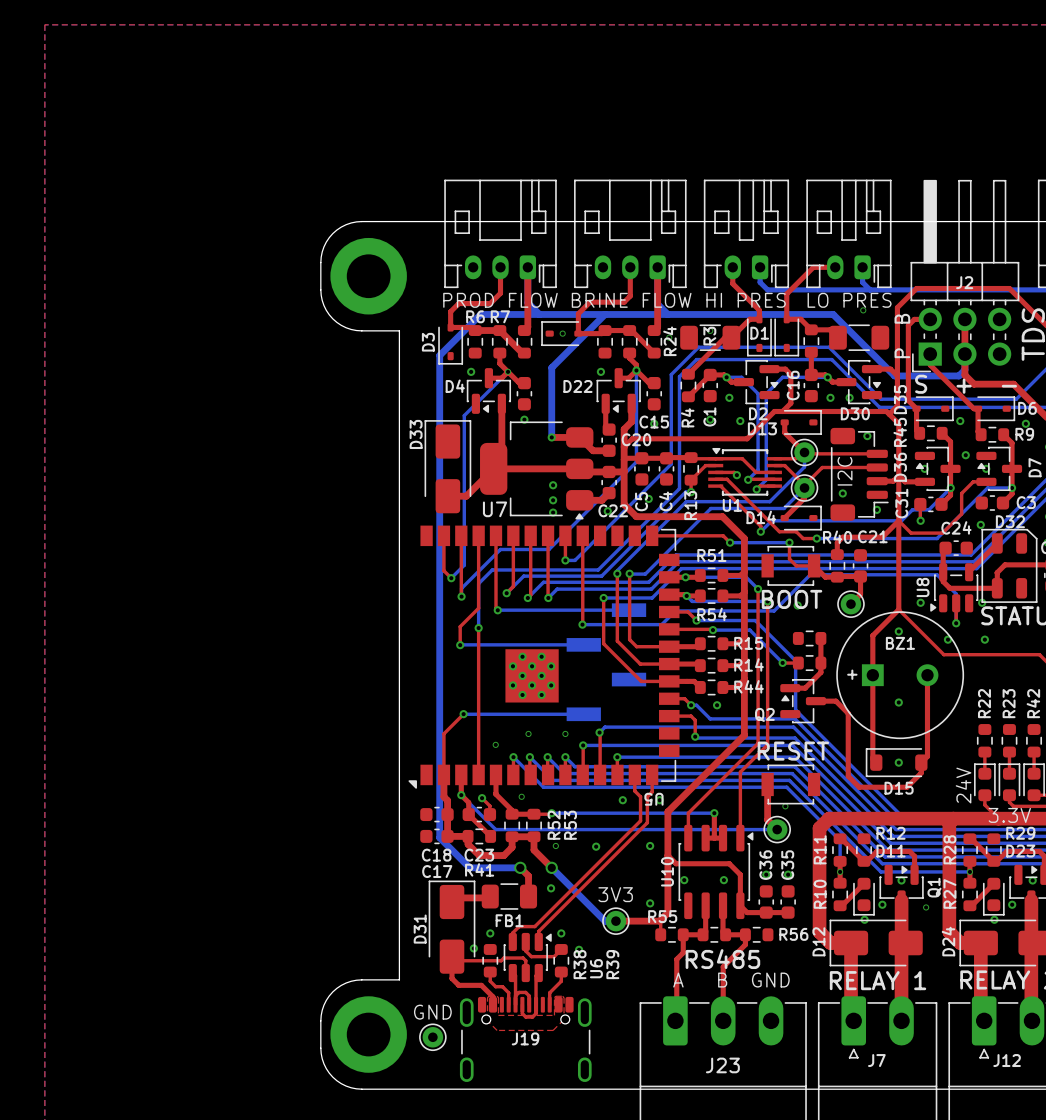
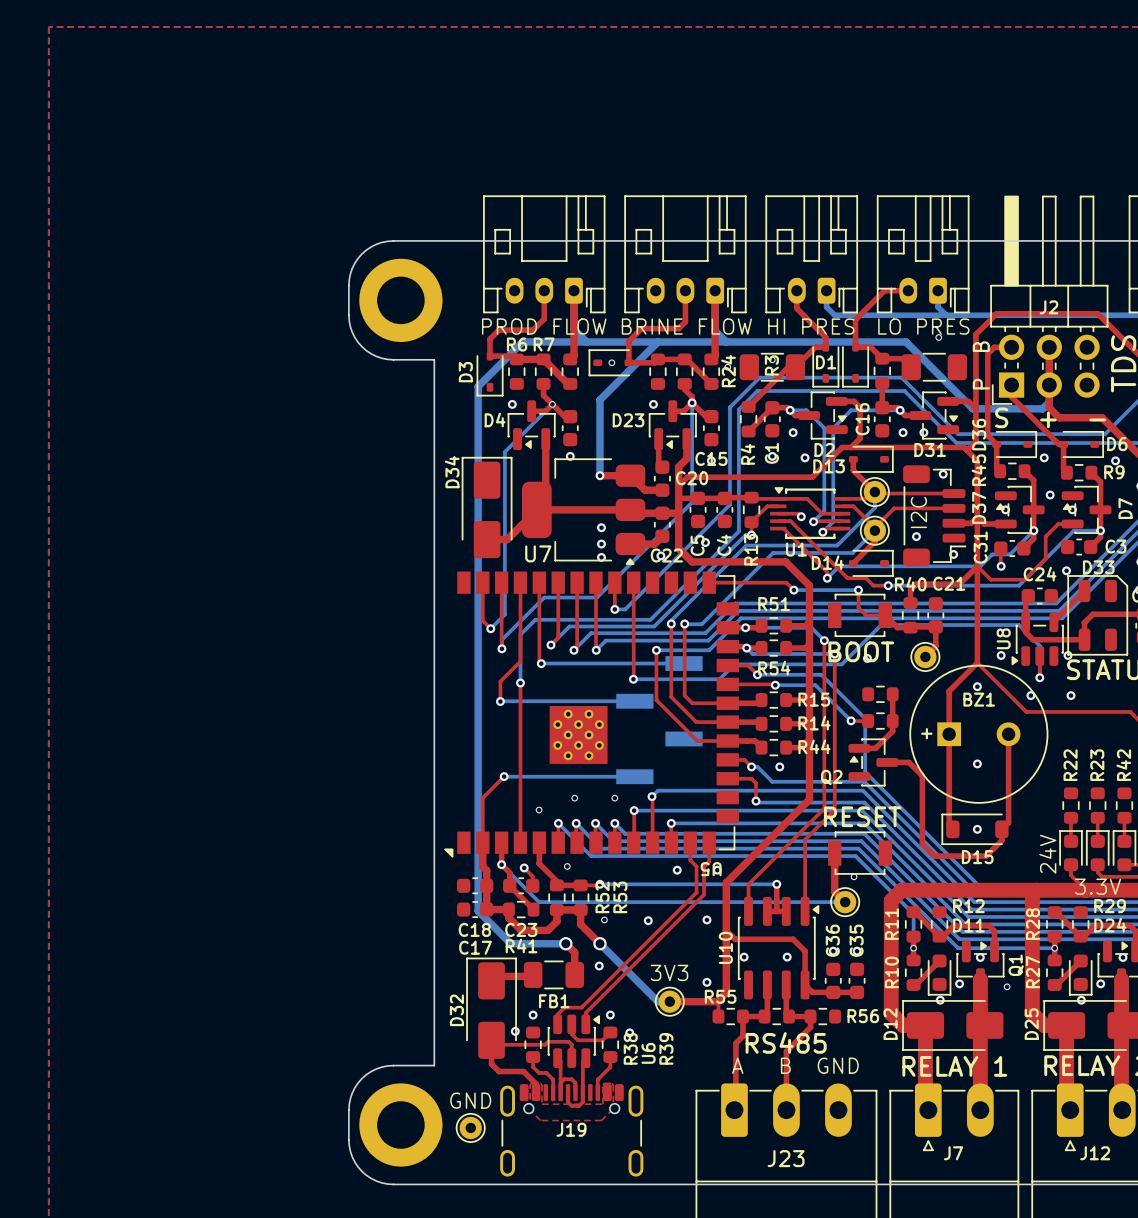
D22 name: D22 (577, 386) -> D23 (628, 420)
D35 name: D35 (900, 399) -> D36 (979, 434)
D30 name: D30 (855, 413) -> D31 (930, 450)
D33 name: D33 (416, 434) -> D34 (452, 472)
D36 name: D36 (900, 467) -> D37 (979, 507)
D32 name: D32 (1010, 521) -> D33 (1098, 567)
D23 name: D23 (1020, 851) -> D24 (1110, 925)
D31 name: D31 (420, 929) -> D32 (456, 1010)
D24 name: D24 (948, 941) -> D25 (1031, 1024)

